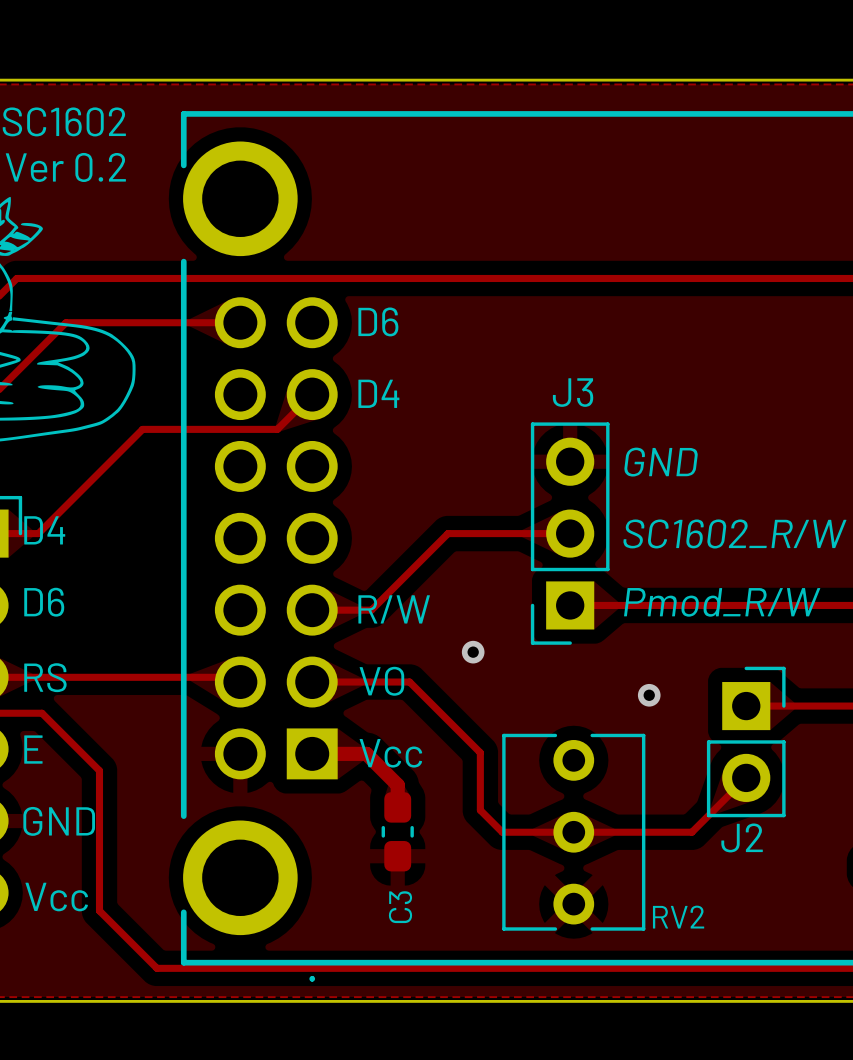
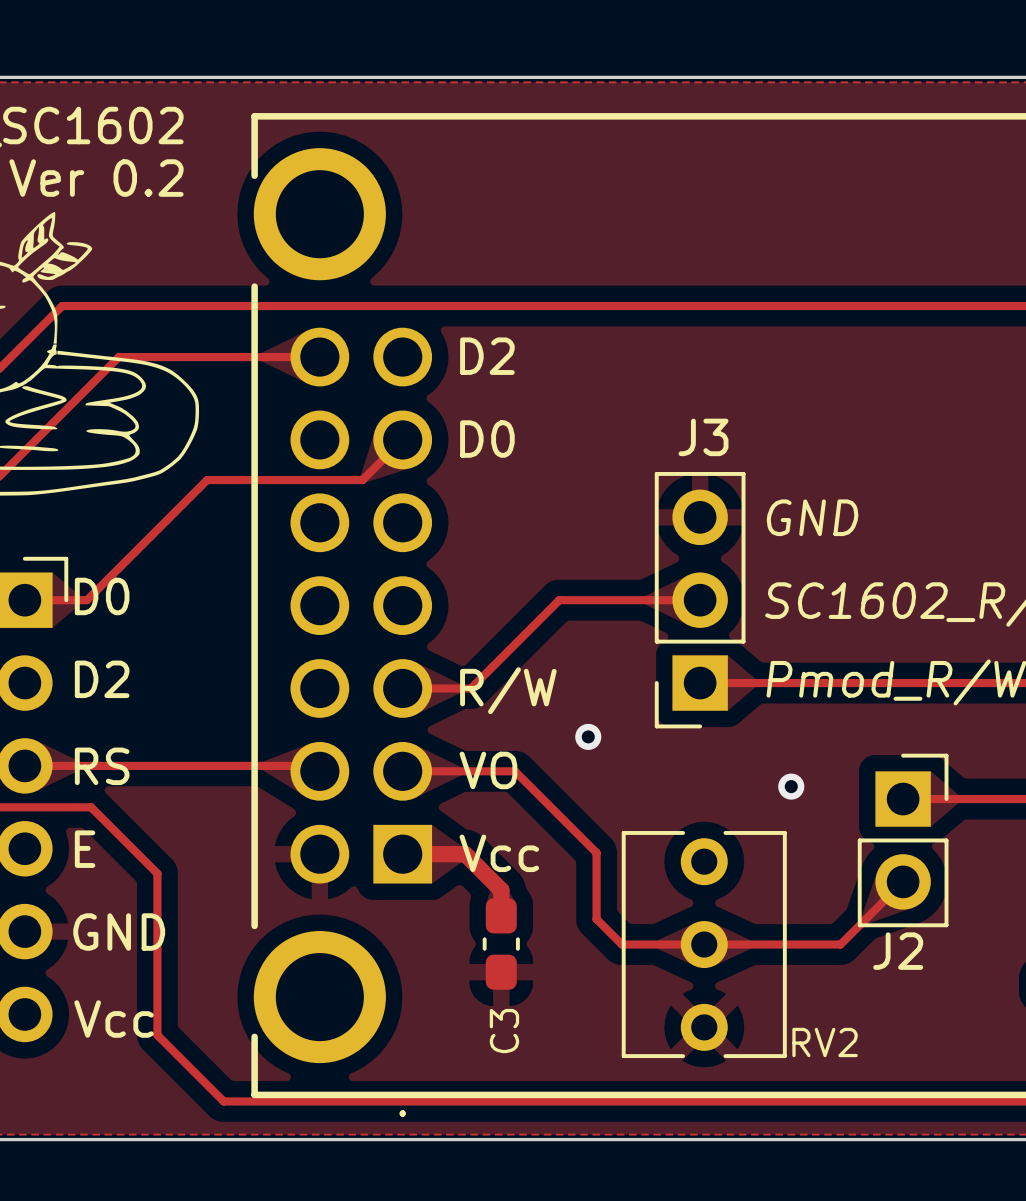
text: D6 (378, 321) -> D2 (487, 356)
text: D4 (378, 393) -> D0 (487, 439)
text: D4 (44, 530) -> D0 (102, 596)
text: D6 (44, 602) -> D2 (102, 679)

